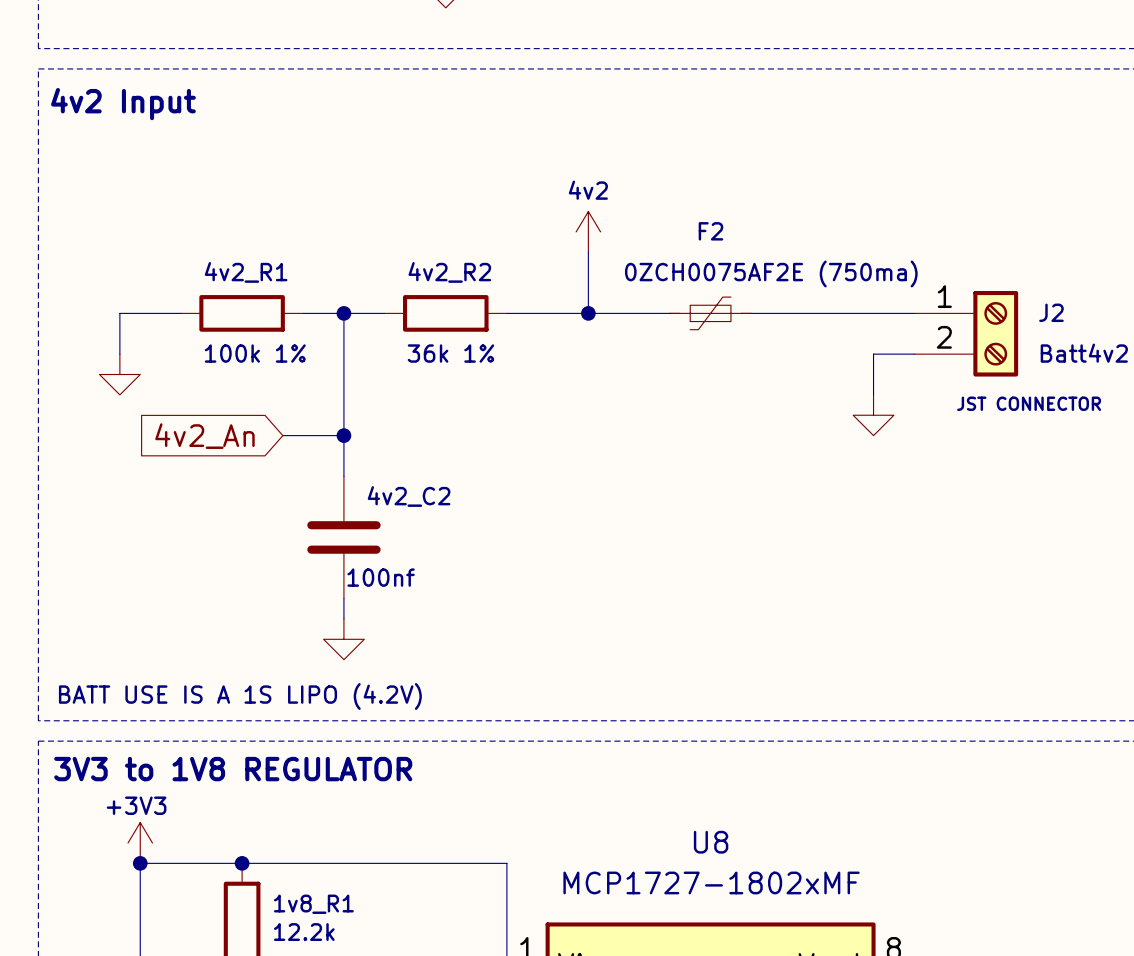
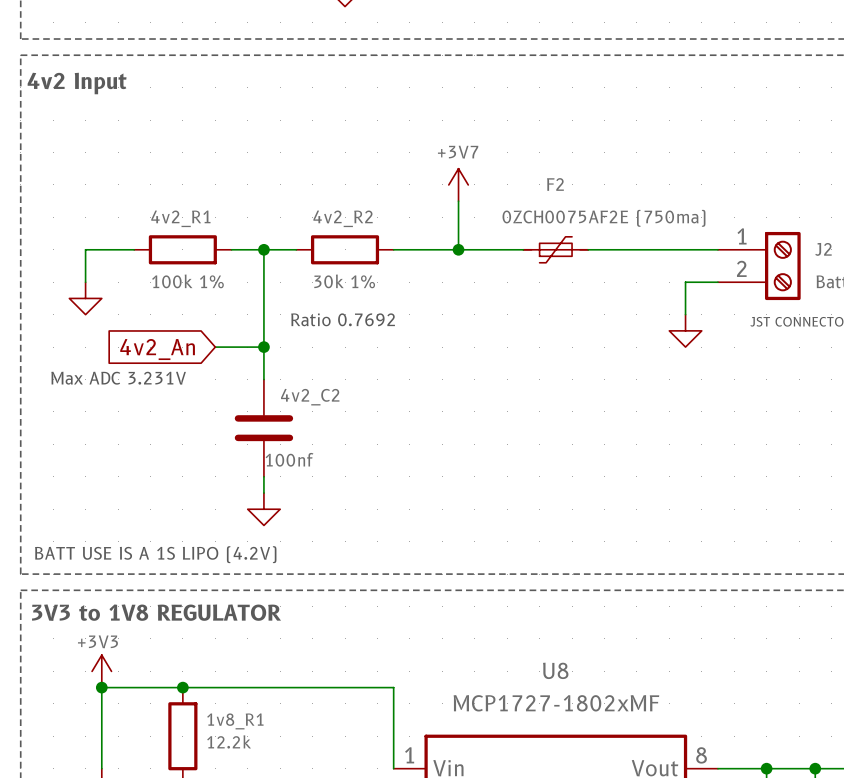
power symbol: 4v2 (588, 231) -> +3V7 (458, 184)
4v2_R2 value: 36k 1% (450, 353) -> 30k 1% (344, 281)
text: none -> Ratio 0.7692 (343, 319)
text: none -> Max ADC 3.231V (118, 378)

